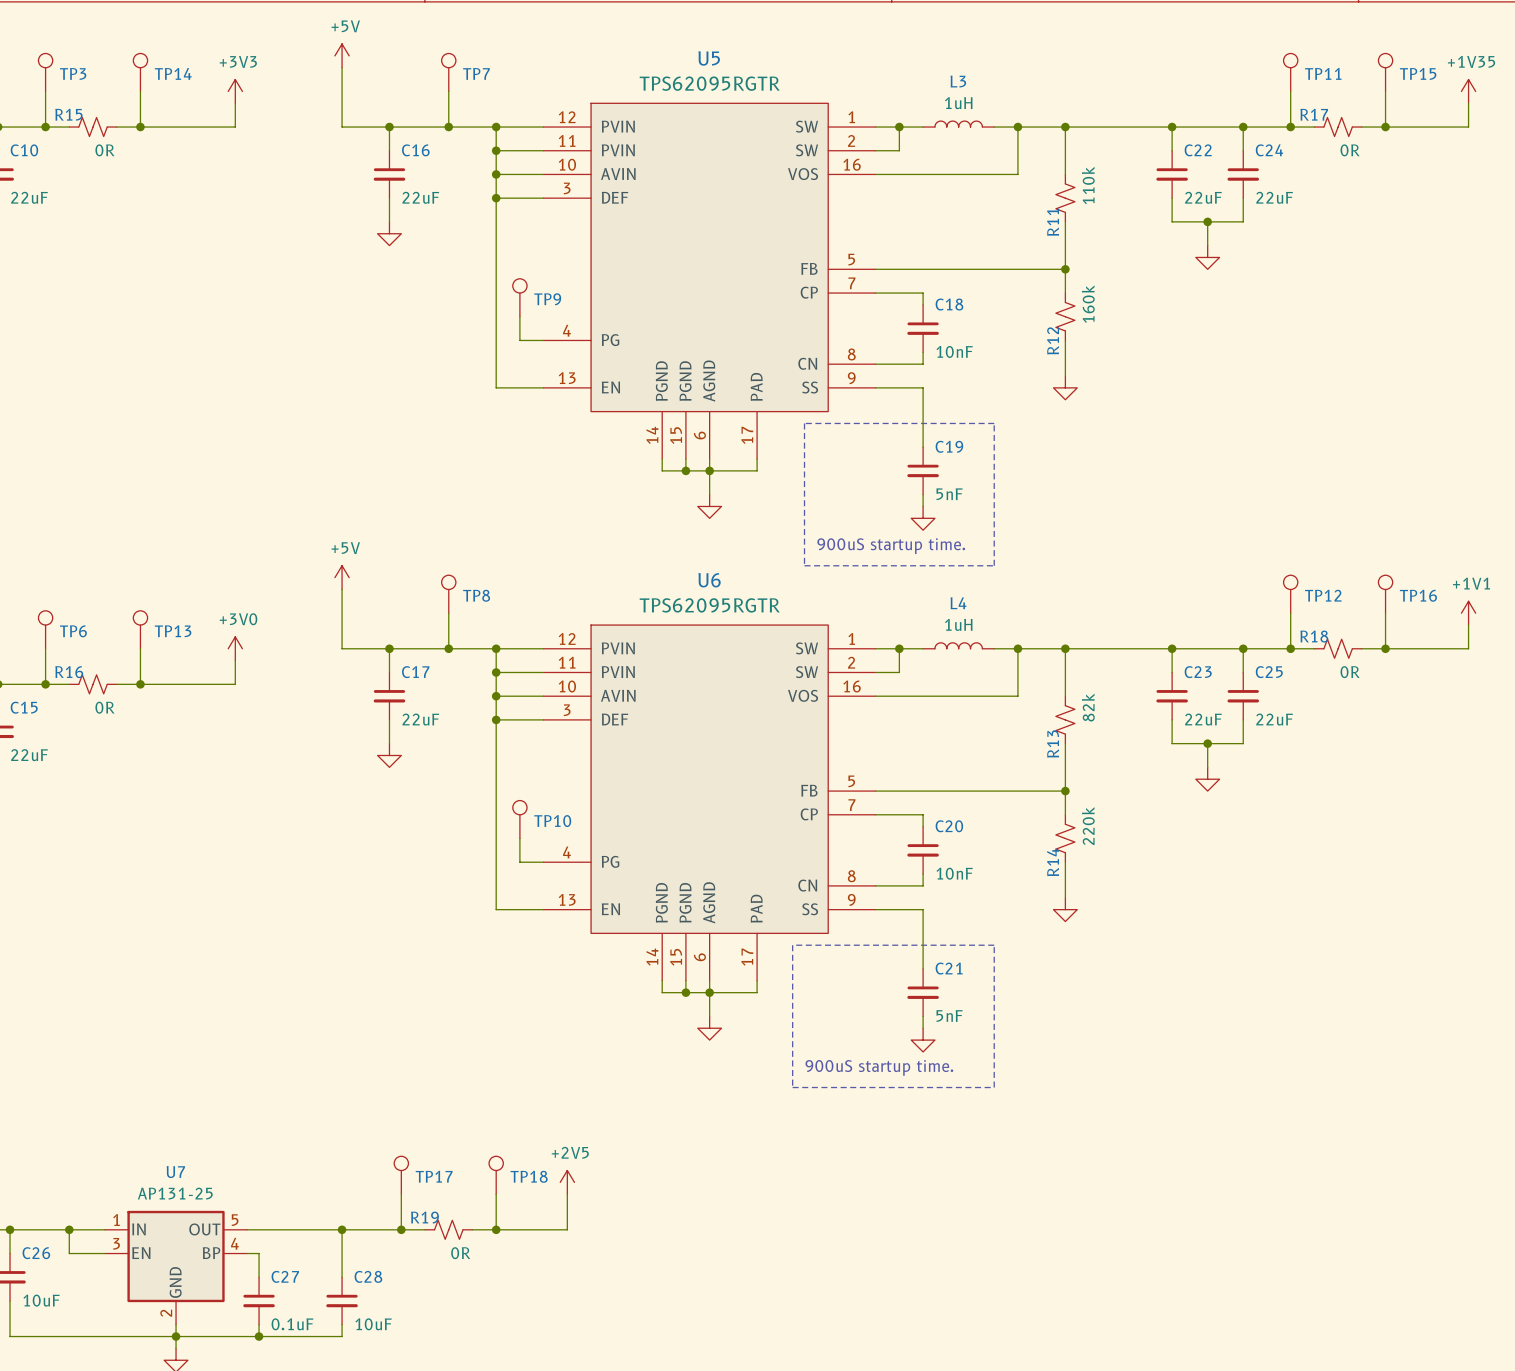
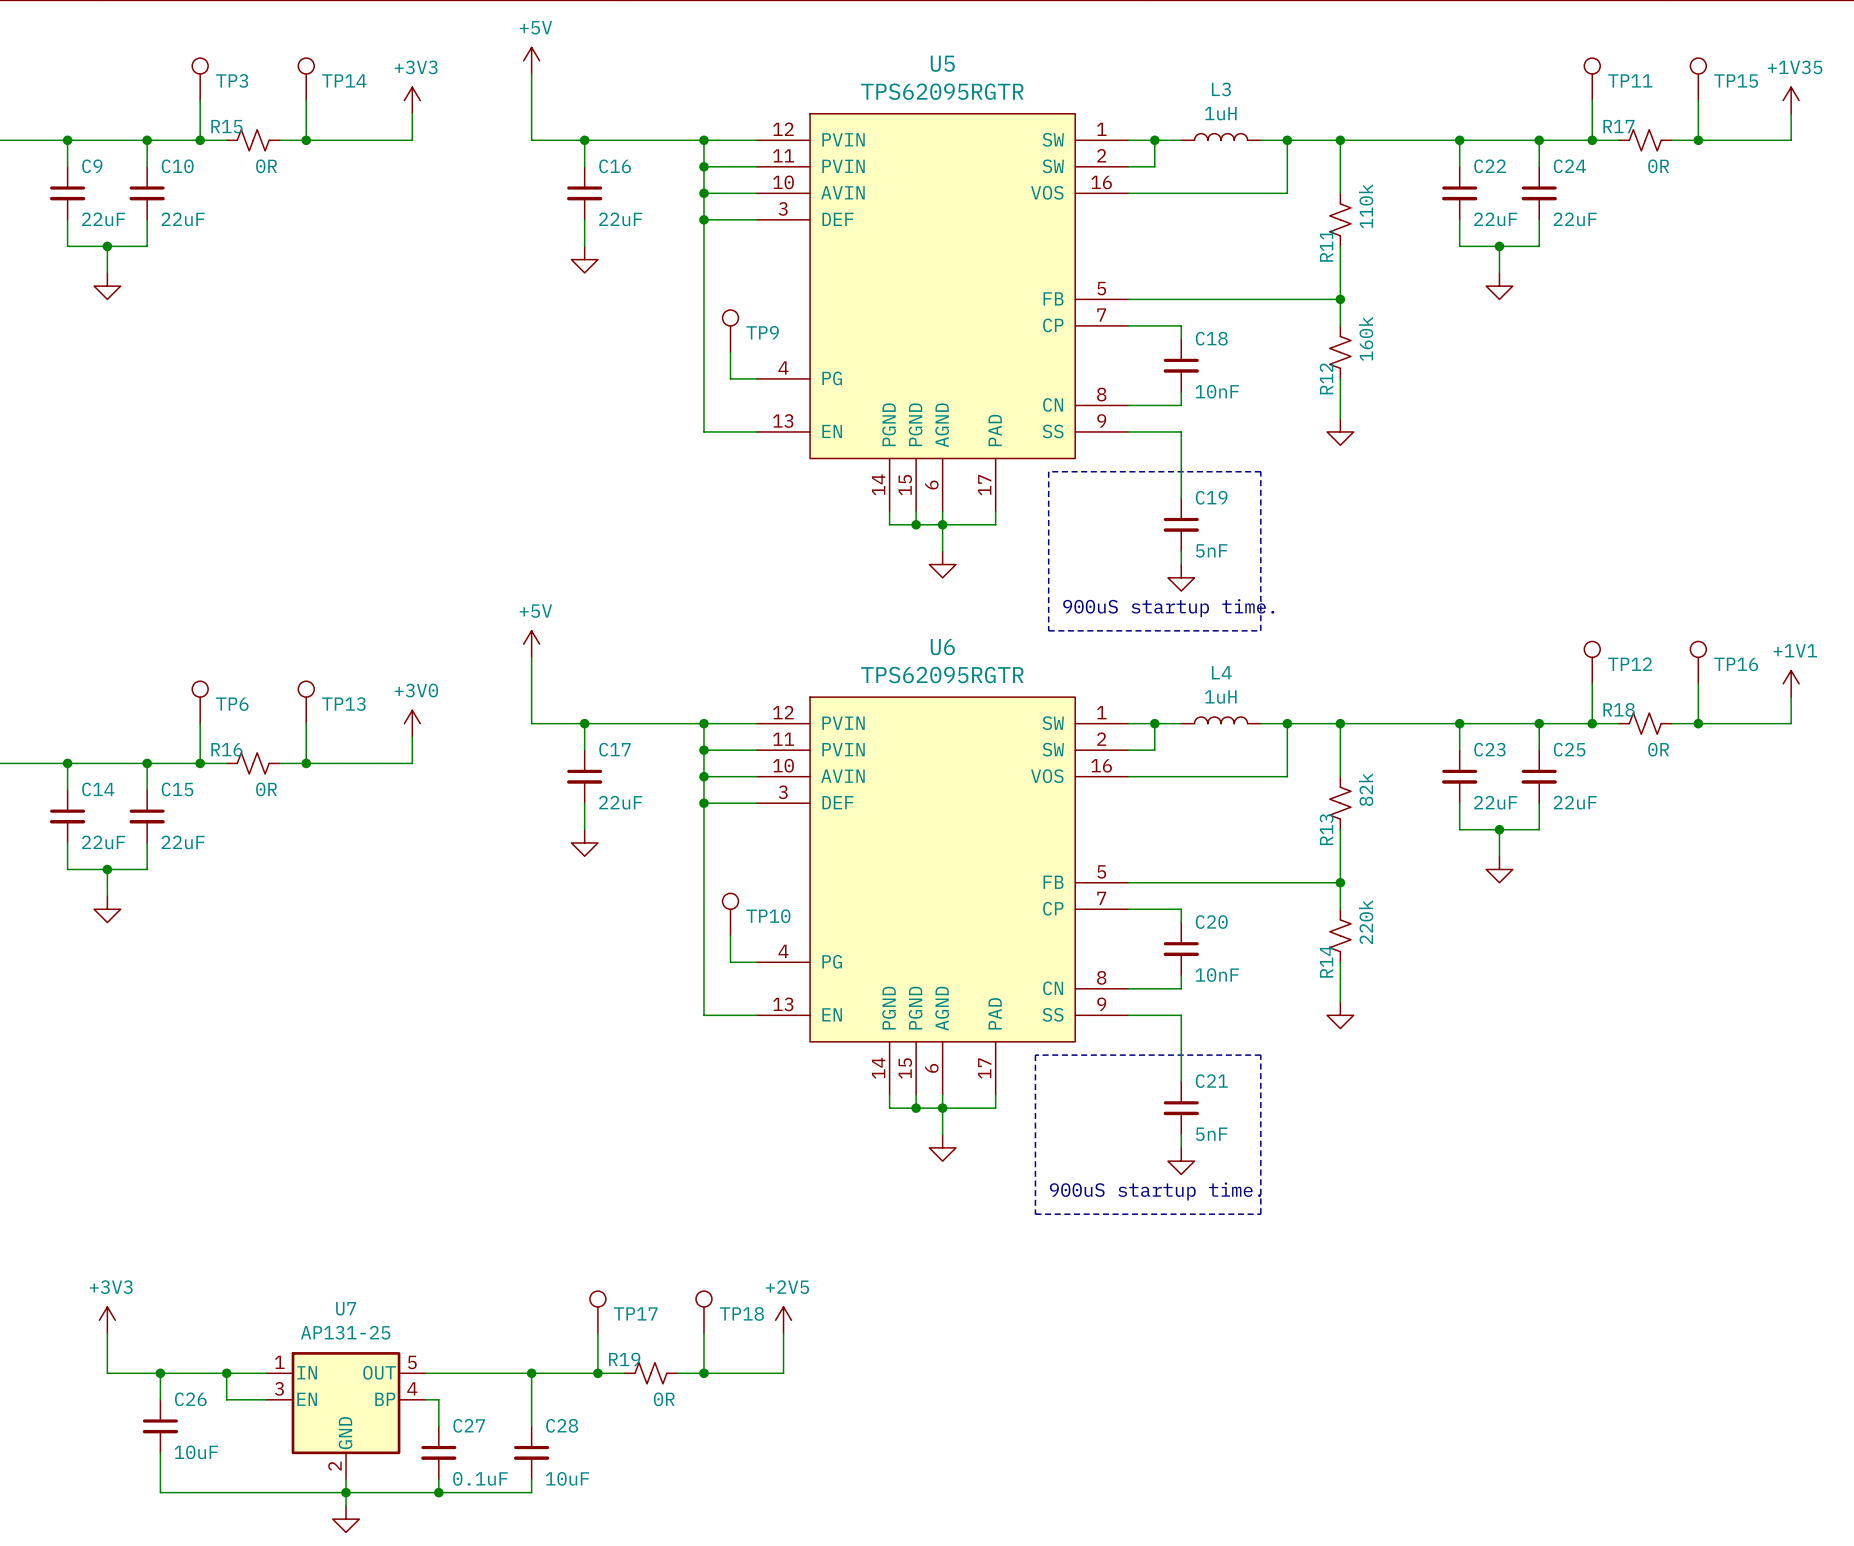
TP7: (448, 72) -> none
wire: (448, 91) (448, 127) -> none
junction: (448, 127) -> none
TP8: (448, 594) -> none
wire: (448, 613) (448, 648) -> none
junction: (448, 648) -> none

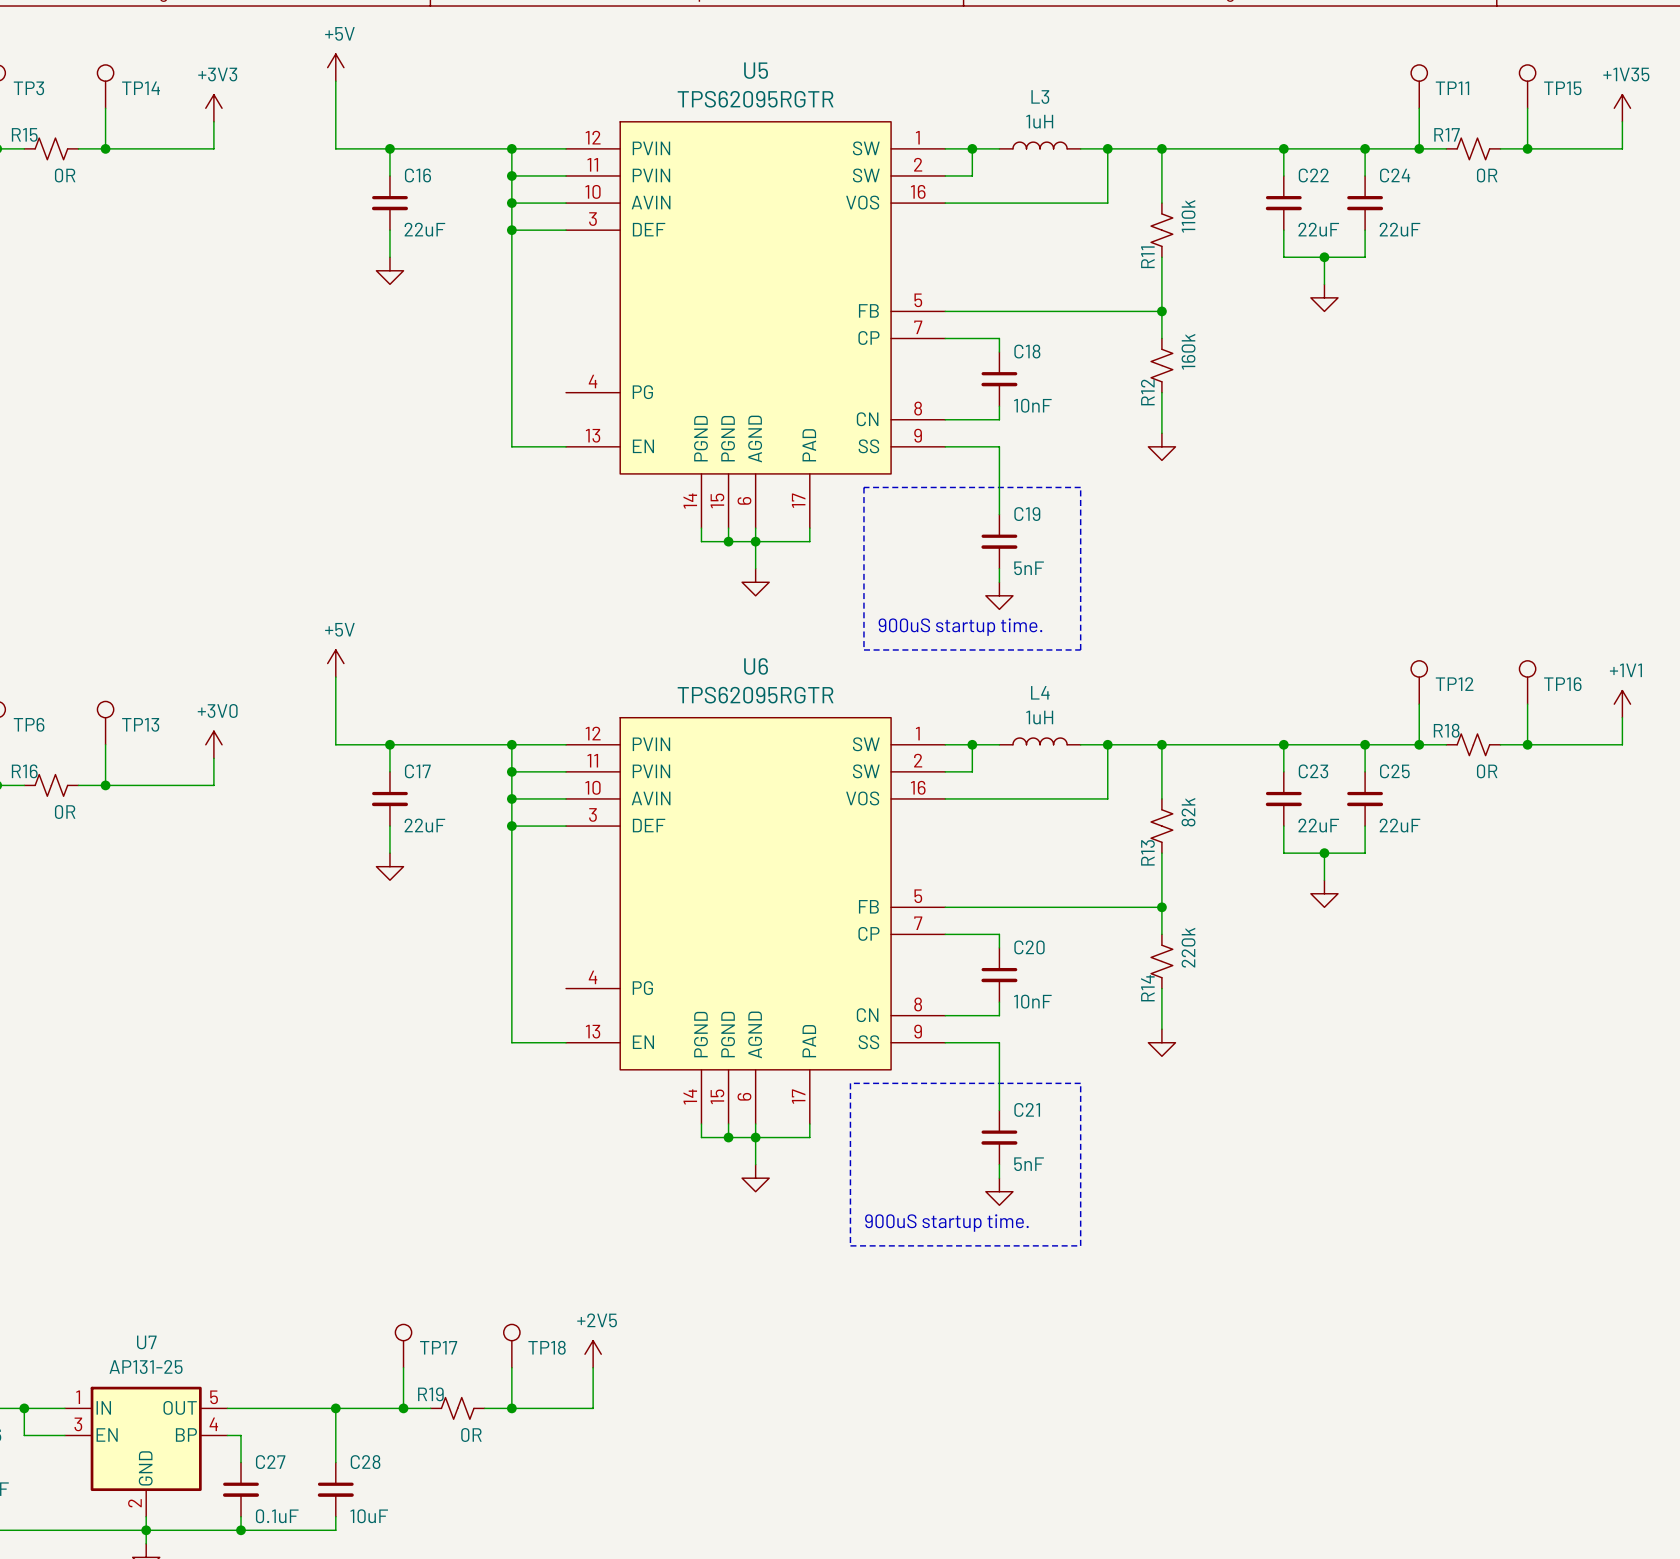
TP9: (730, 331) -> none
wire: (730, 352) (730, 378) (757, 378) -> none
TP10: (730, 914) -> none
wire: (730, 935) (730, 962) (757, 962) -> none

